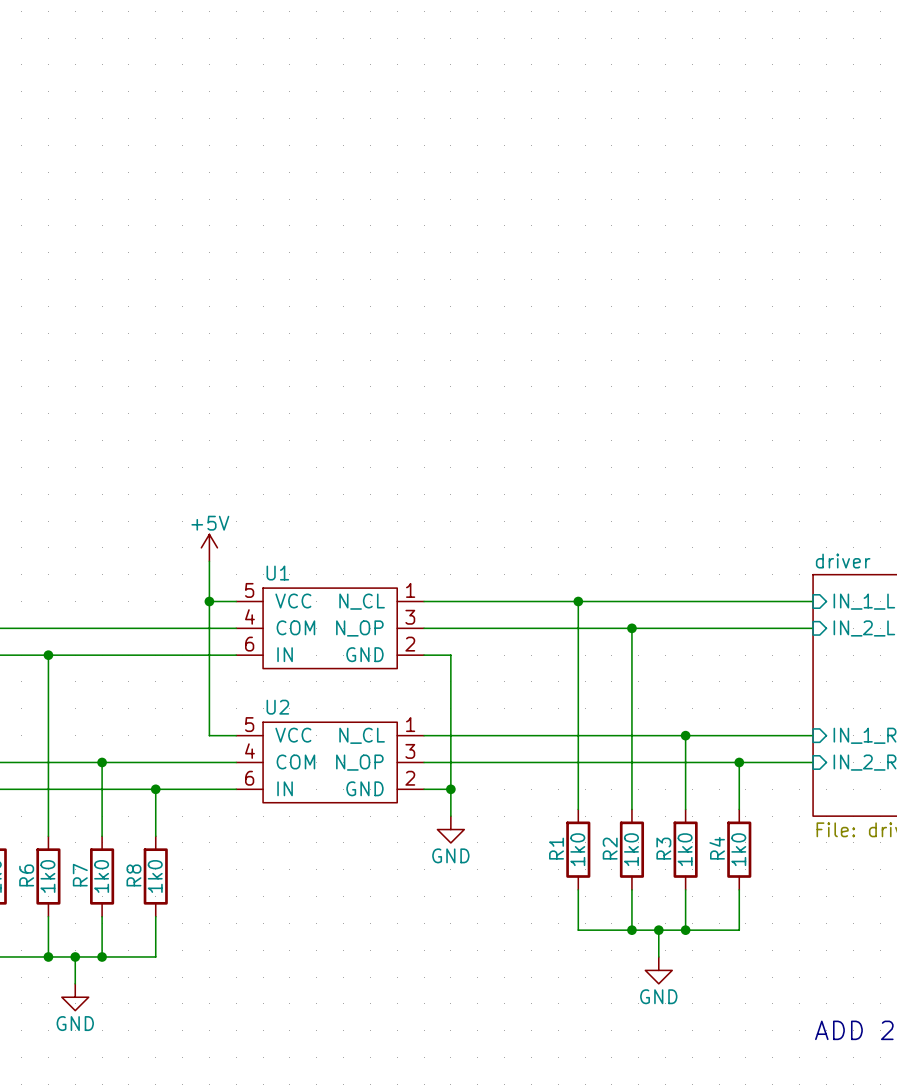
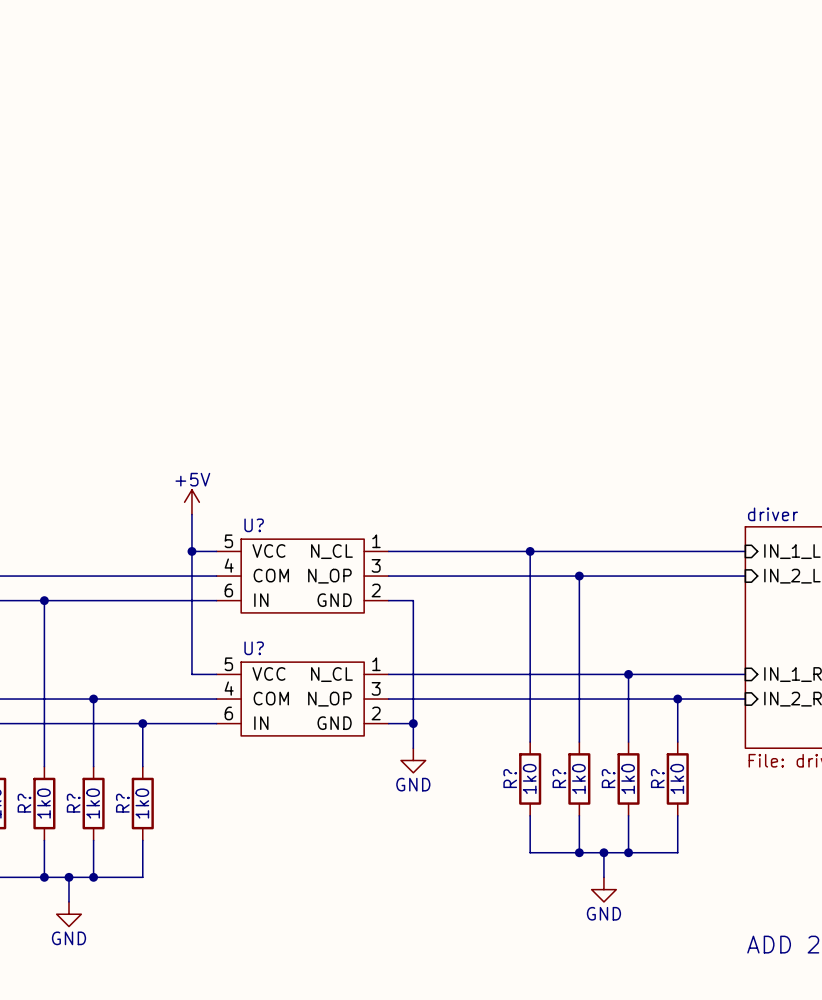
U1 name: U1 (277, 573) -> U? (254, 525)
U2 name: U2 (277, 707) -> U? (254, 648)
R1 name: R1 (556, 848) -> R? (510, 778)
R2 name: R2 (610, 848) -> R? (559, 778)
R3 name: R3 (663, 848) -> R? (608, 778)
R4 name: R4 (717, 848) -> R? (657, 778)
R6 name: R6 (26, 875) -> R? (24, 803)
R7 name: R7 (80, 875) -> R? (73, 803)
R8 name: R8 (133, 875) -> R? (122, 803)

